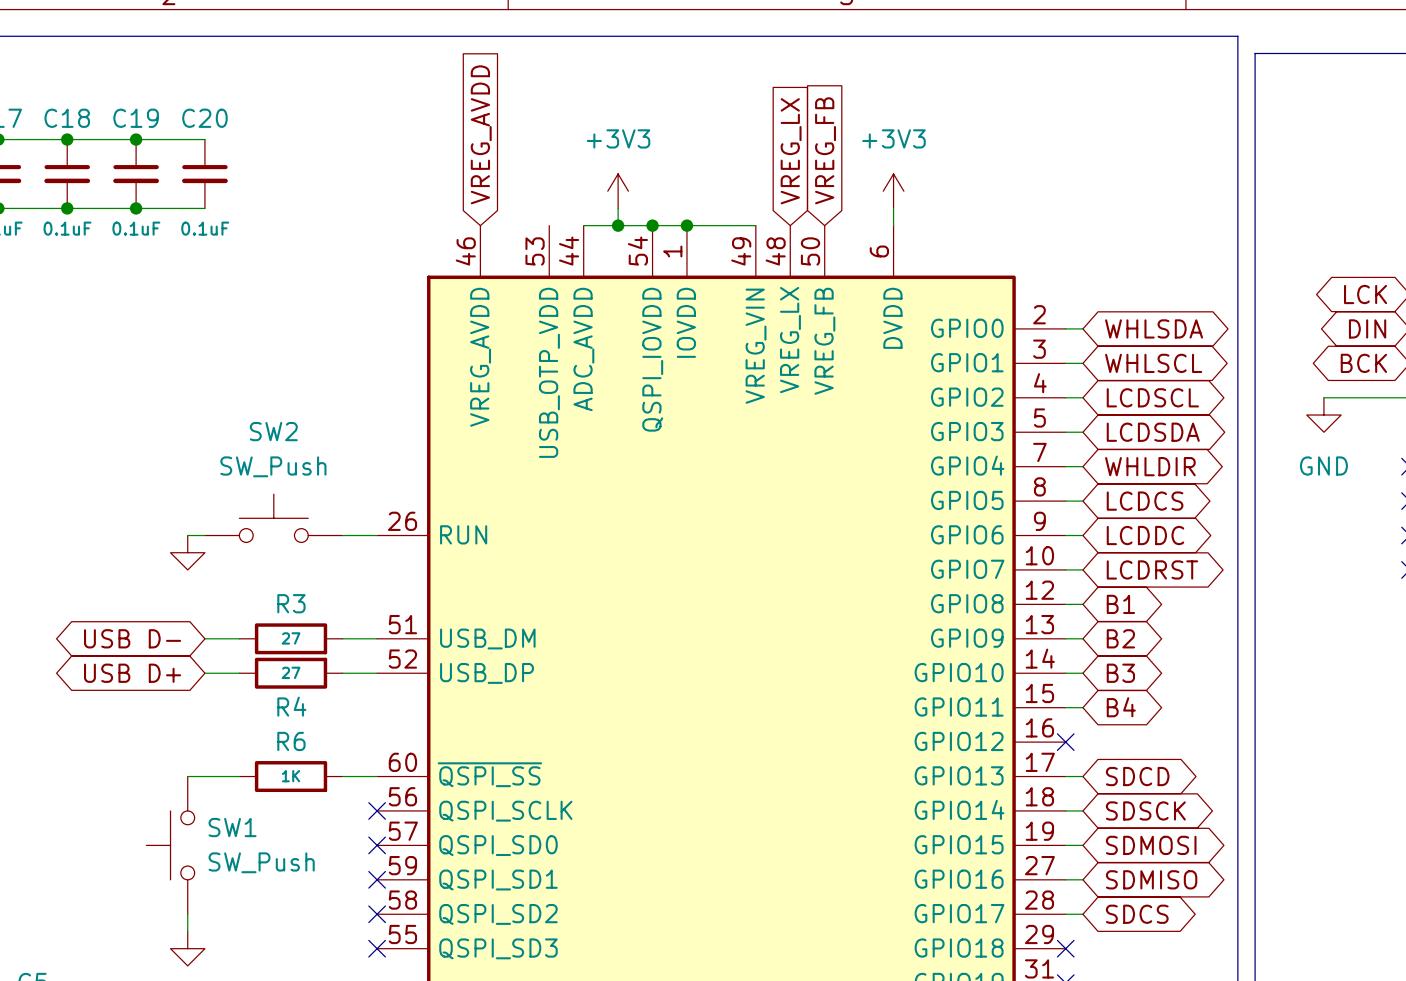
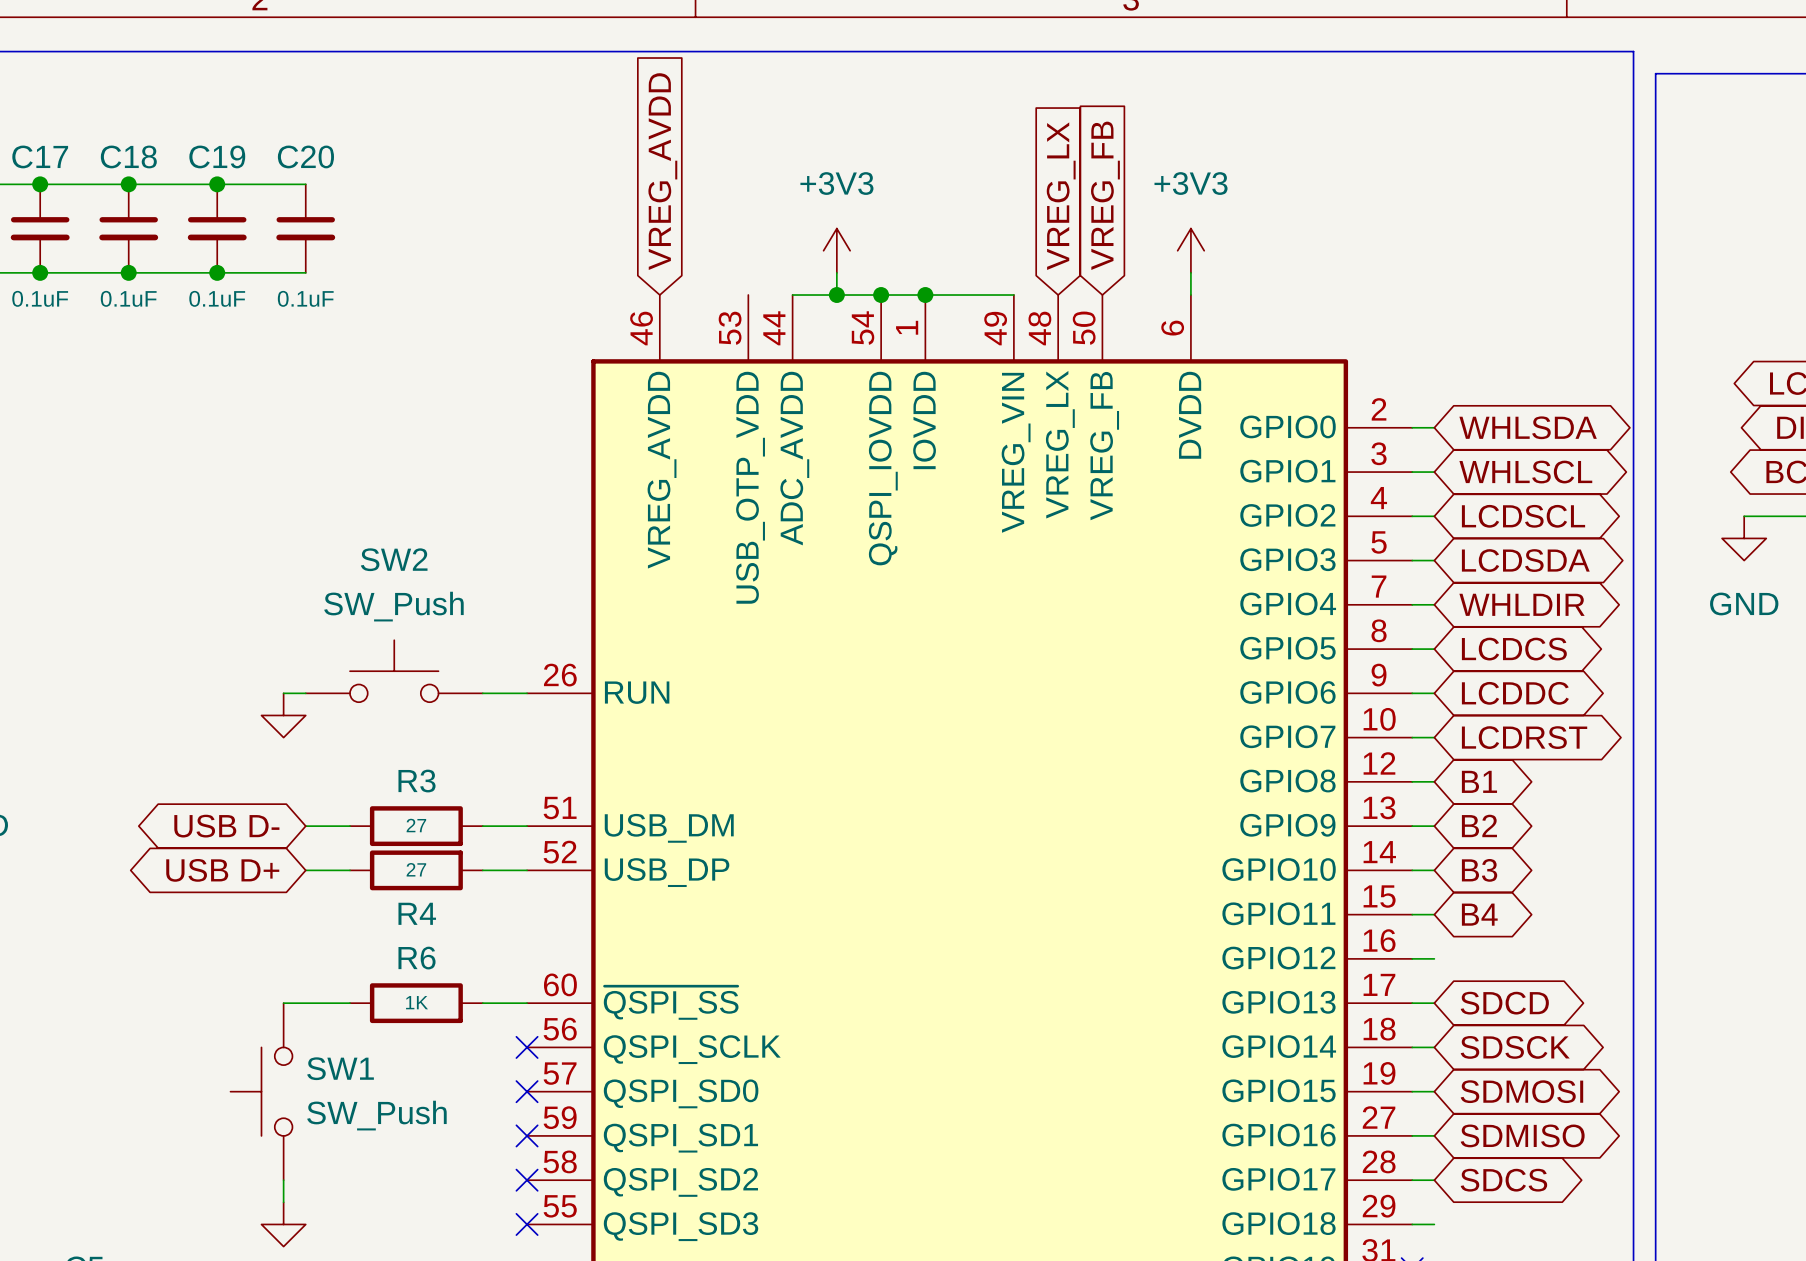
wire: none -> (1412, 958) (1434, 958)
no-connect mark: (1065, 742) -> none
wire: none -> (1412, 1224) (1434, 1224)
no-connect mark: (1065, 948) -> none

